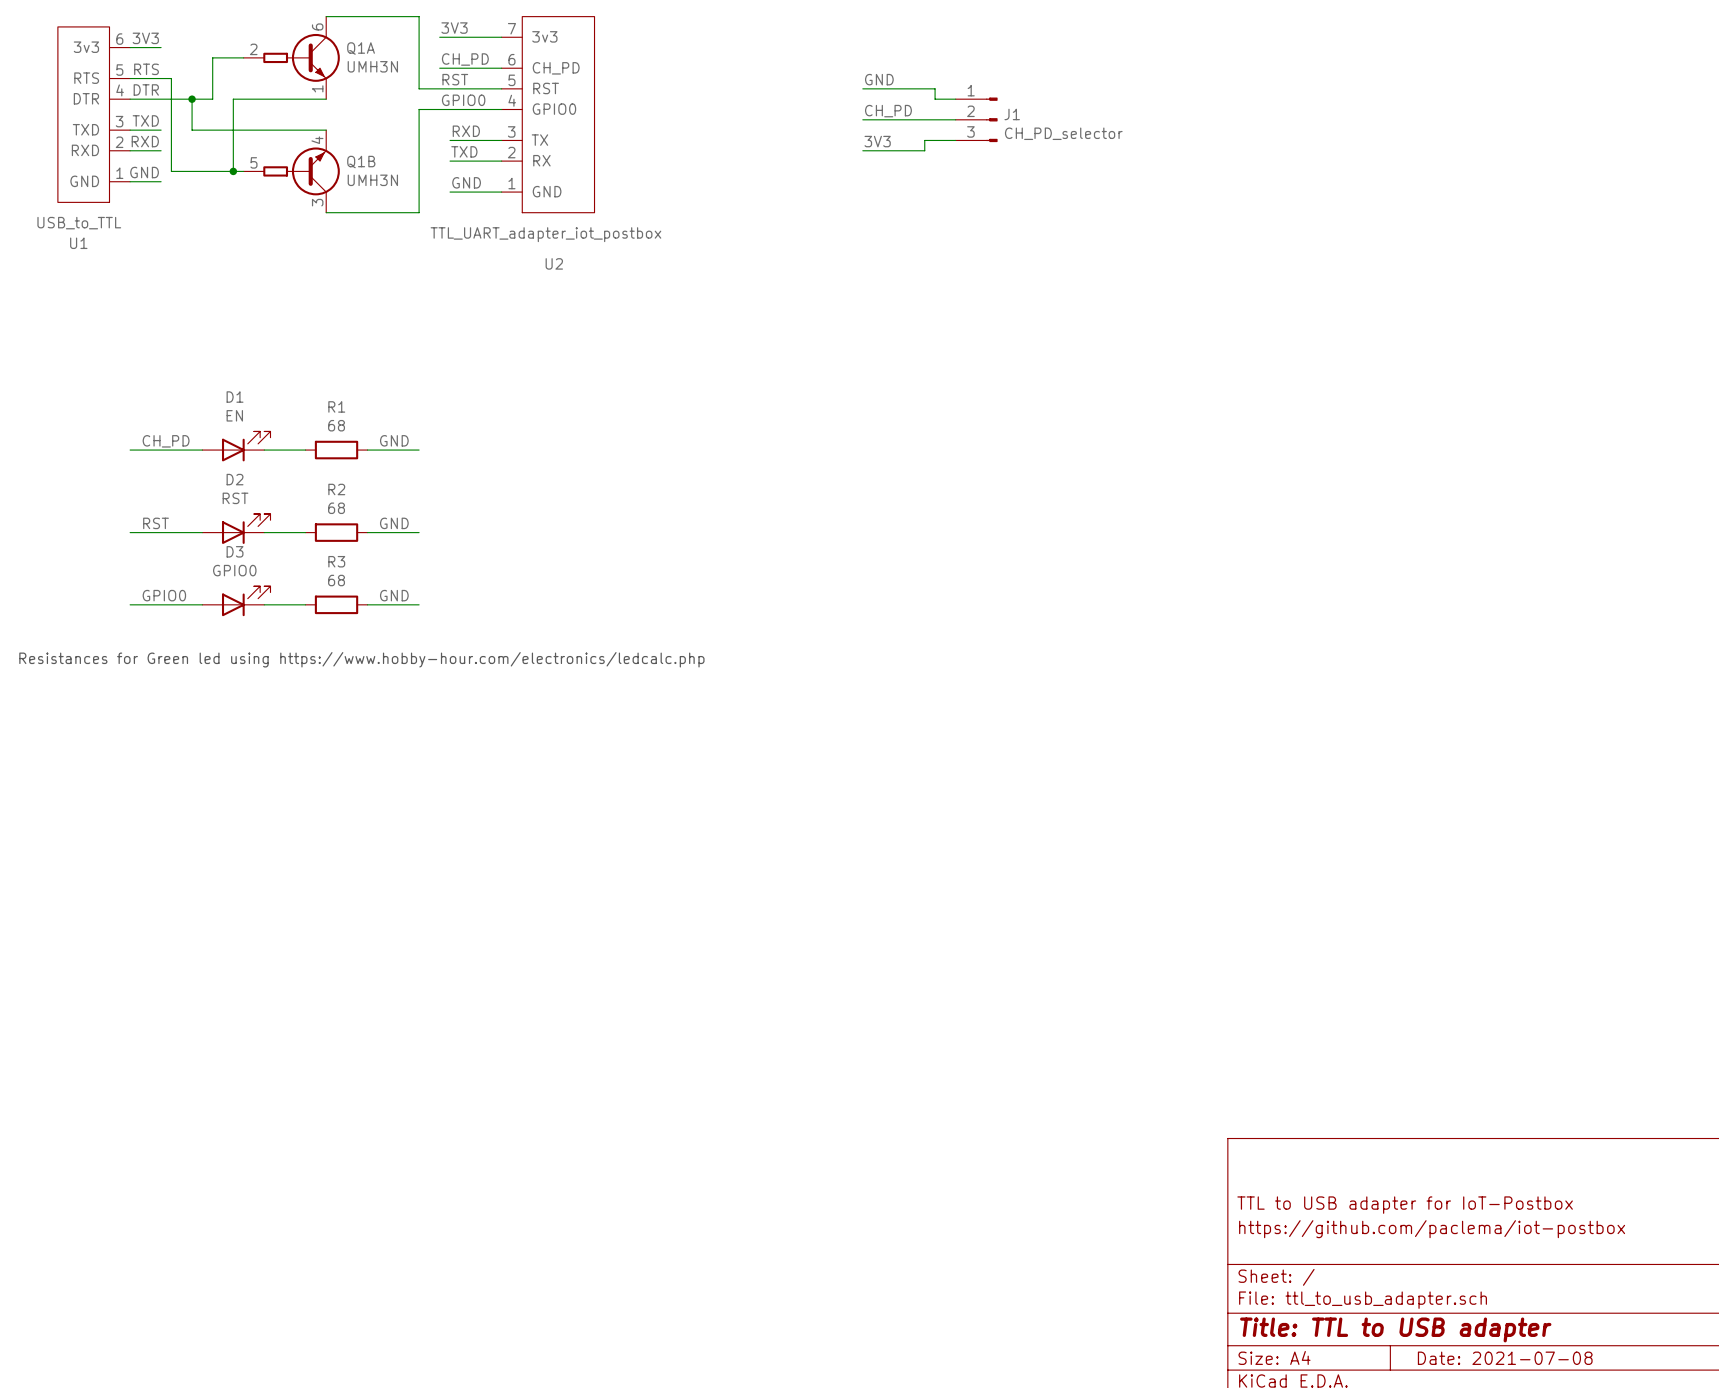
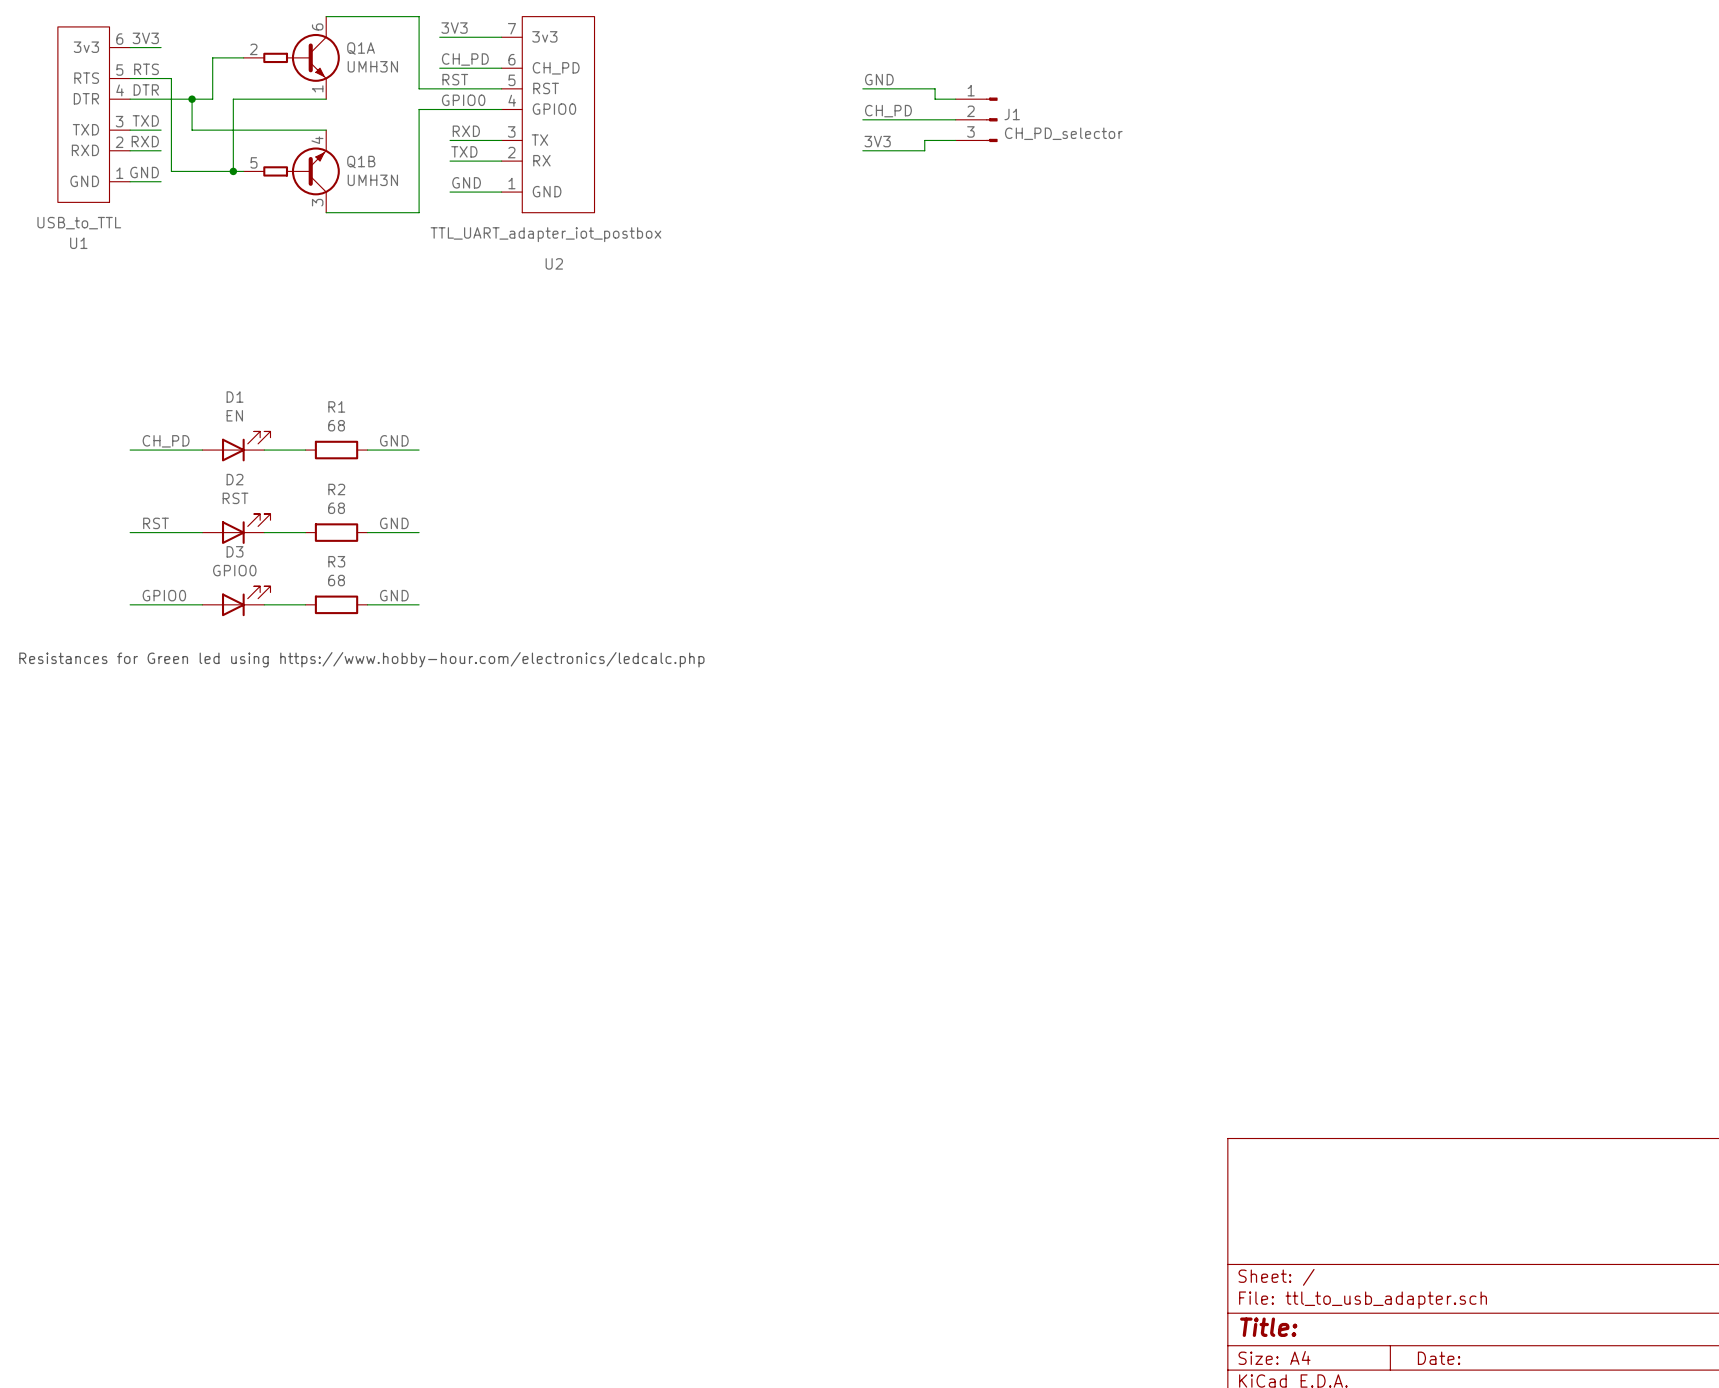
title block: TTL to USB adapter for IoT-Postbox (1405, 1205) -> none
title block: https://github.com/paclema/iot-postbox (1432, 1229) -> none
title block: Title: TTL to USB adapter (1395, 1329) -> Title: (1268, 1327)
title block: Date: 2021-07-08 (1505, 1358) -> Date: (1439, 1358)

